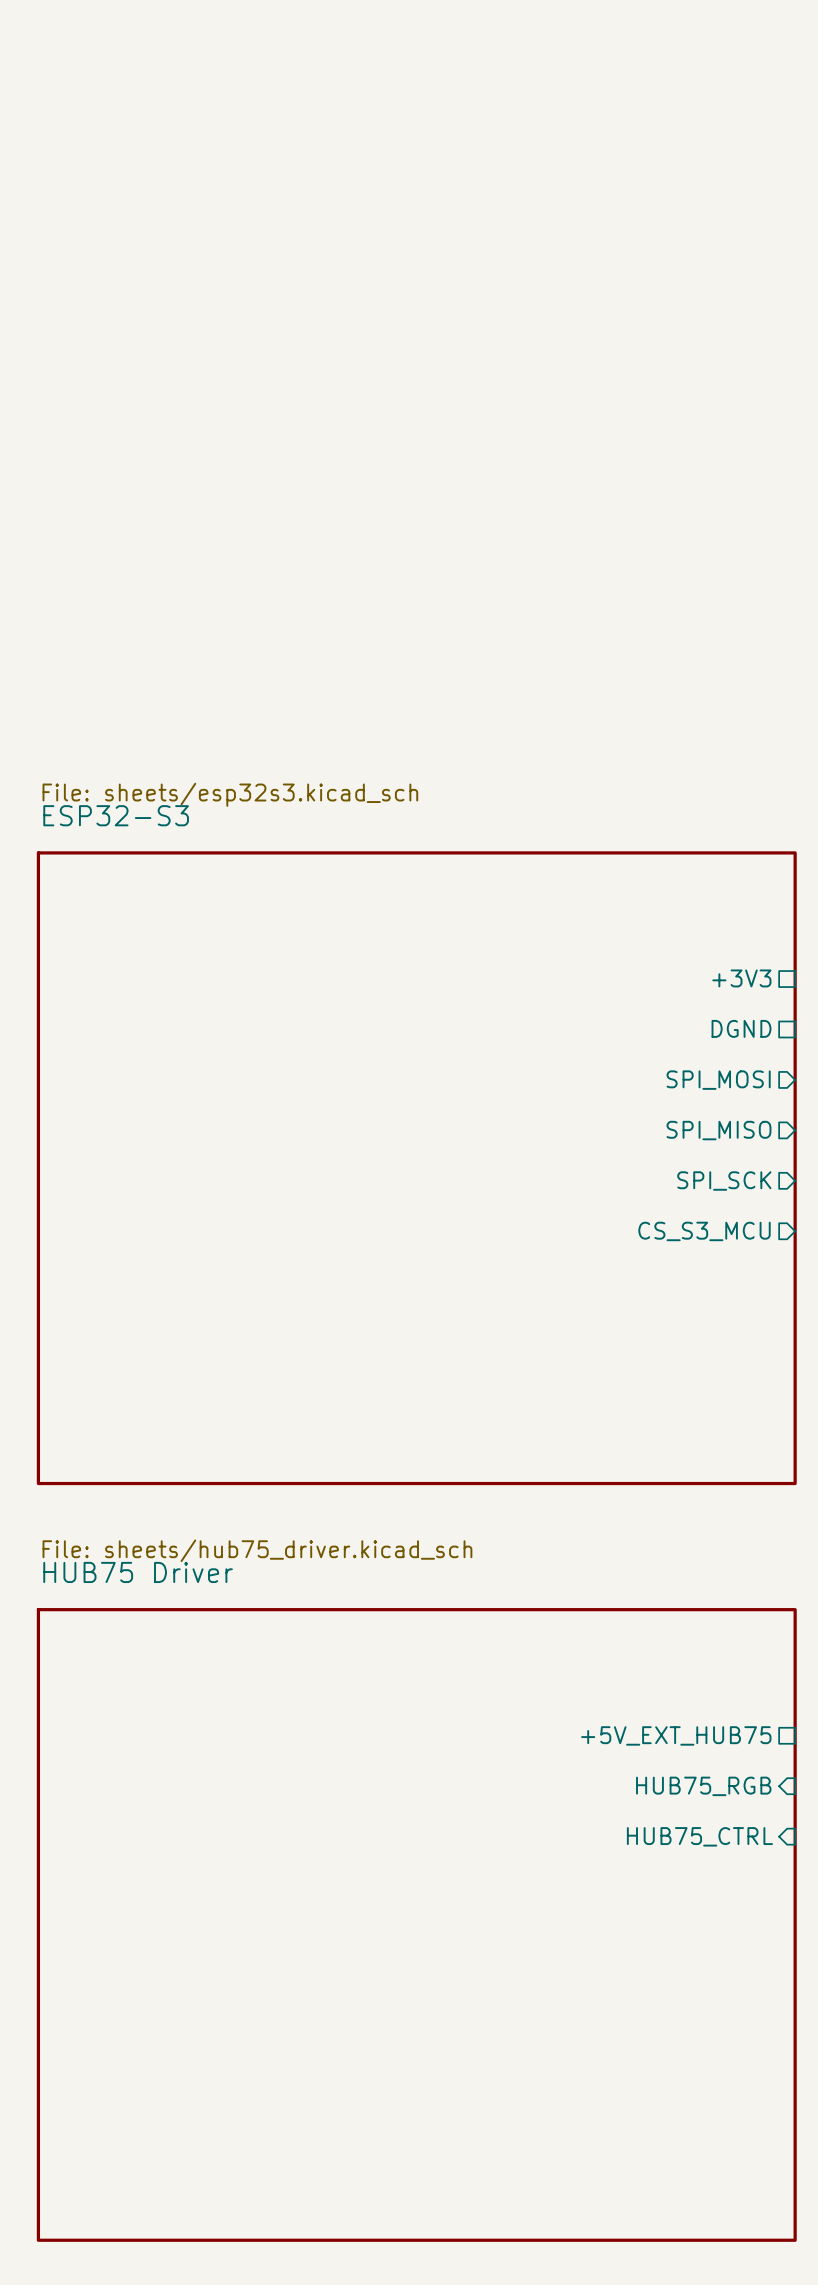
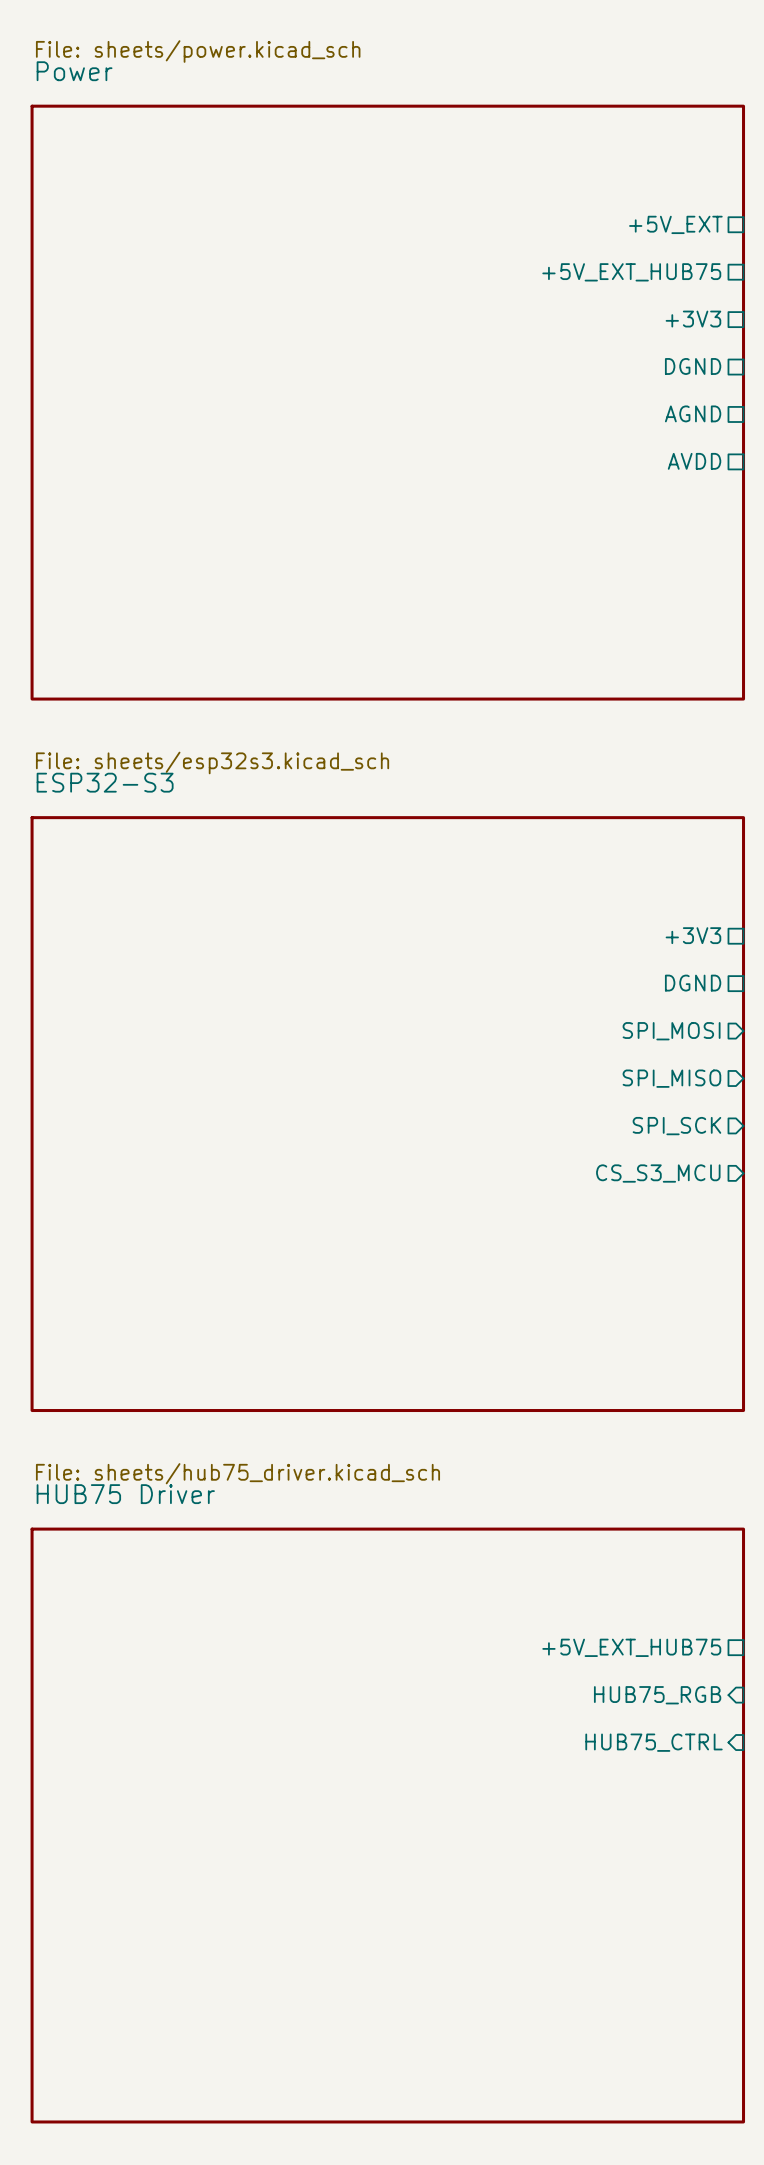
sheet pin: none -> +5V_EXT (675, 224)
sheet pin: none -> +5V_EXT_HUB75 (631, 272)
sheet pin: none -> +3V3 (693, 319)
sheet pin: none -> DGND (693, 366)
sheet Power: none -> File: sheets/power.kicad_sch (387, 402)
sheet pin: none -> AGND (693, 413)
sheet pin: none -> AVDD (694, 461)

